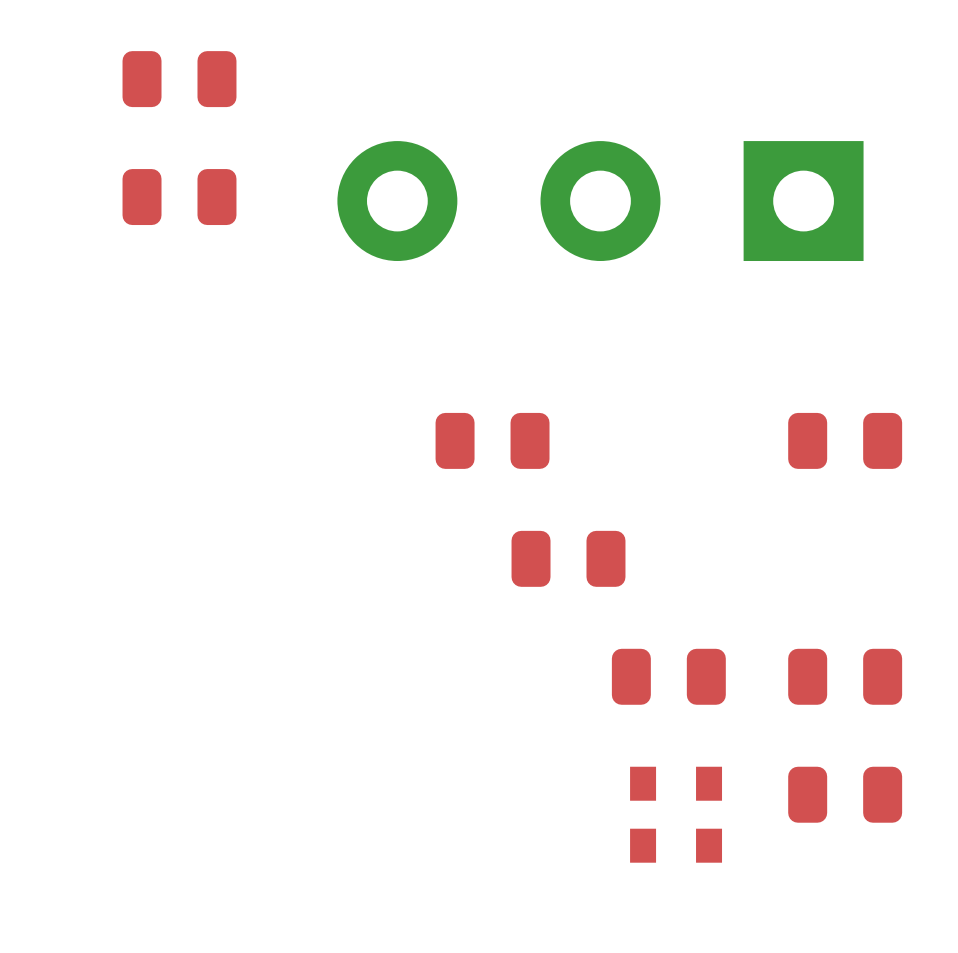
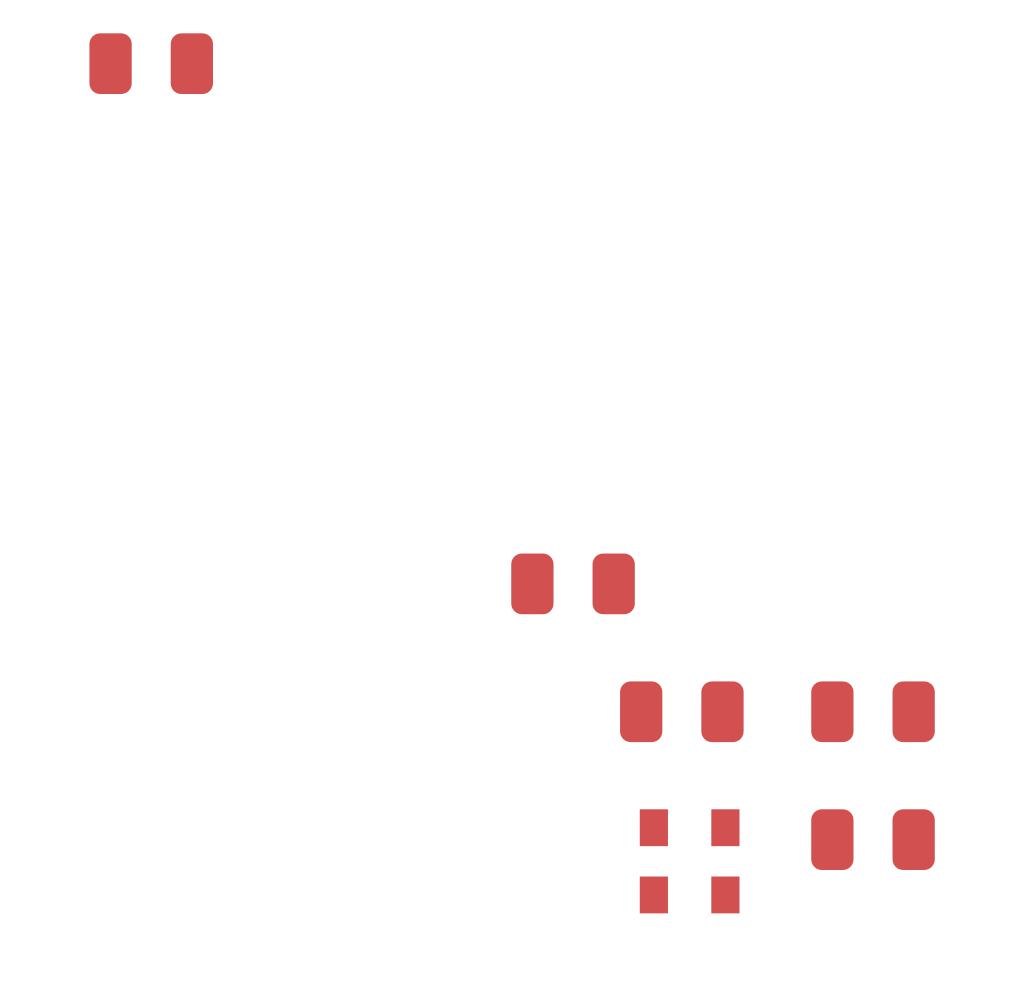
part: (179, 197) -> none
part: (600, 201) -> none
part: (492, 440) -> none
part: (845, 440) -> none

